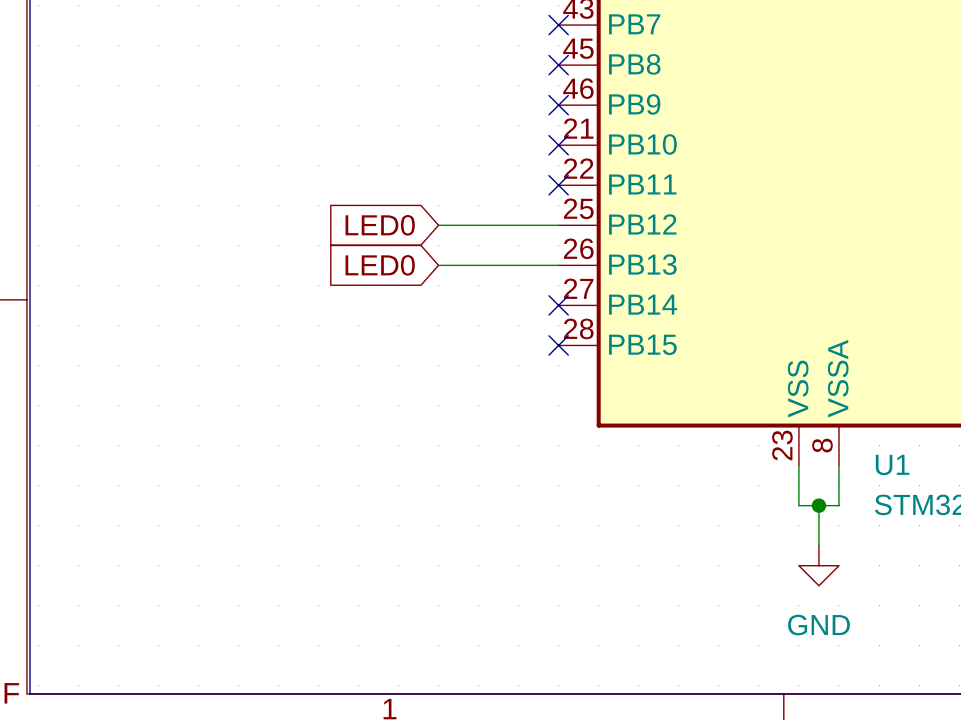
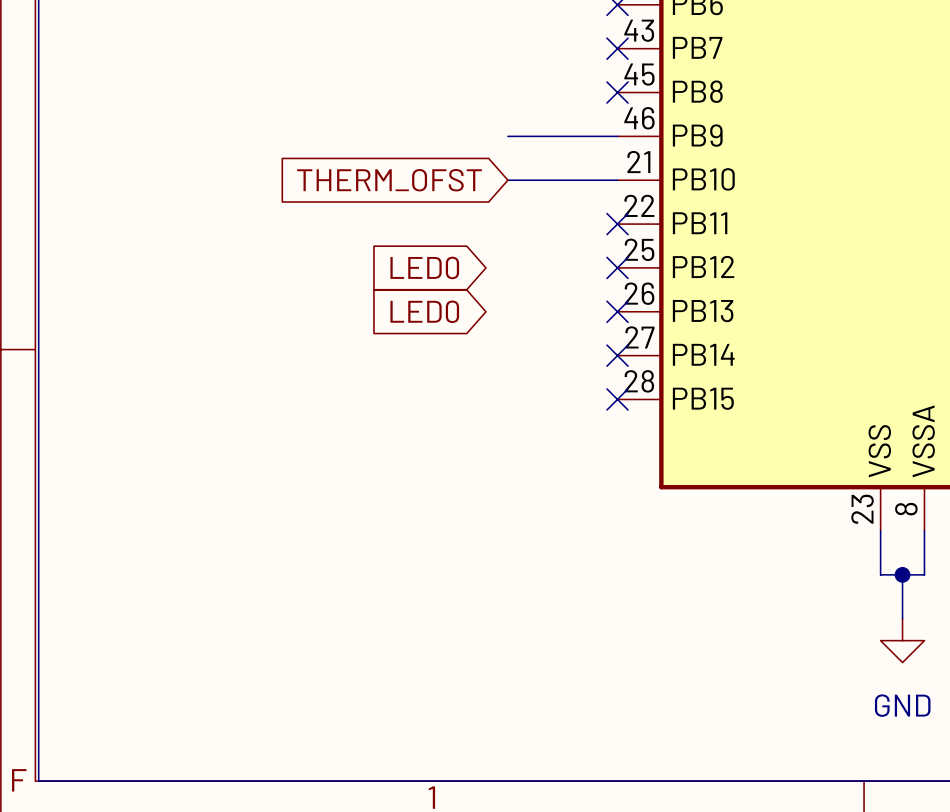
wire: none -> (507, 136) (617, 136)
no-connect mark: (558, 105) -> none
wire: none -> (507, 180) (617, 180)
no-connect mark: (558, 145) -> none
global label: none -> THERM_OFST (389, 180)
wire: (438, 225) (558, 225) -> none
no-connect mark: none -> (617, 267)
wire: (438, 265) (558, 265) -> none
no-connect mark: none -> (617, 311)

